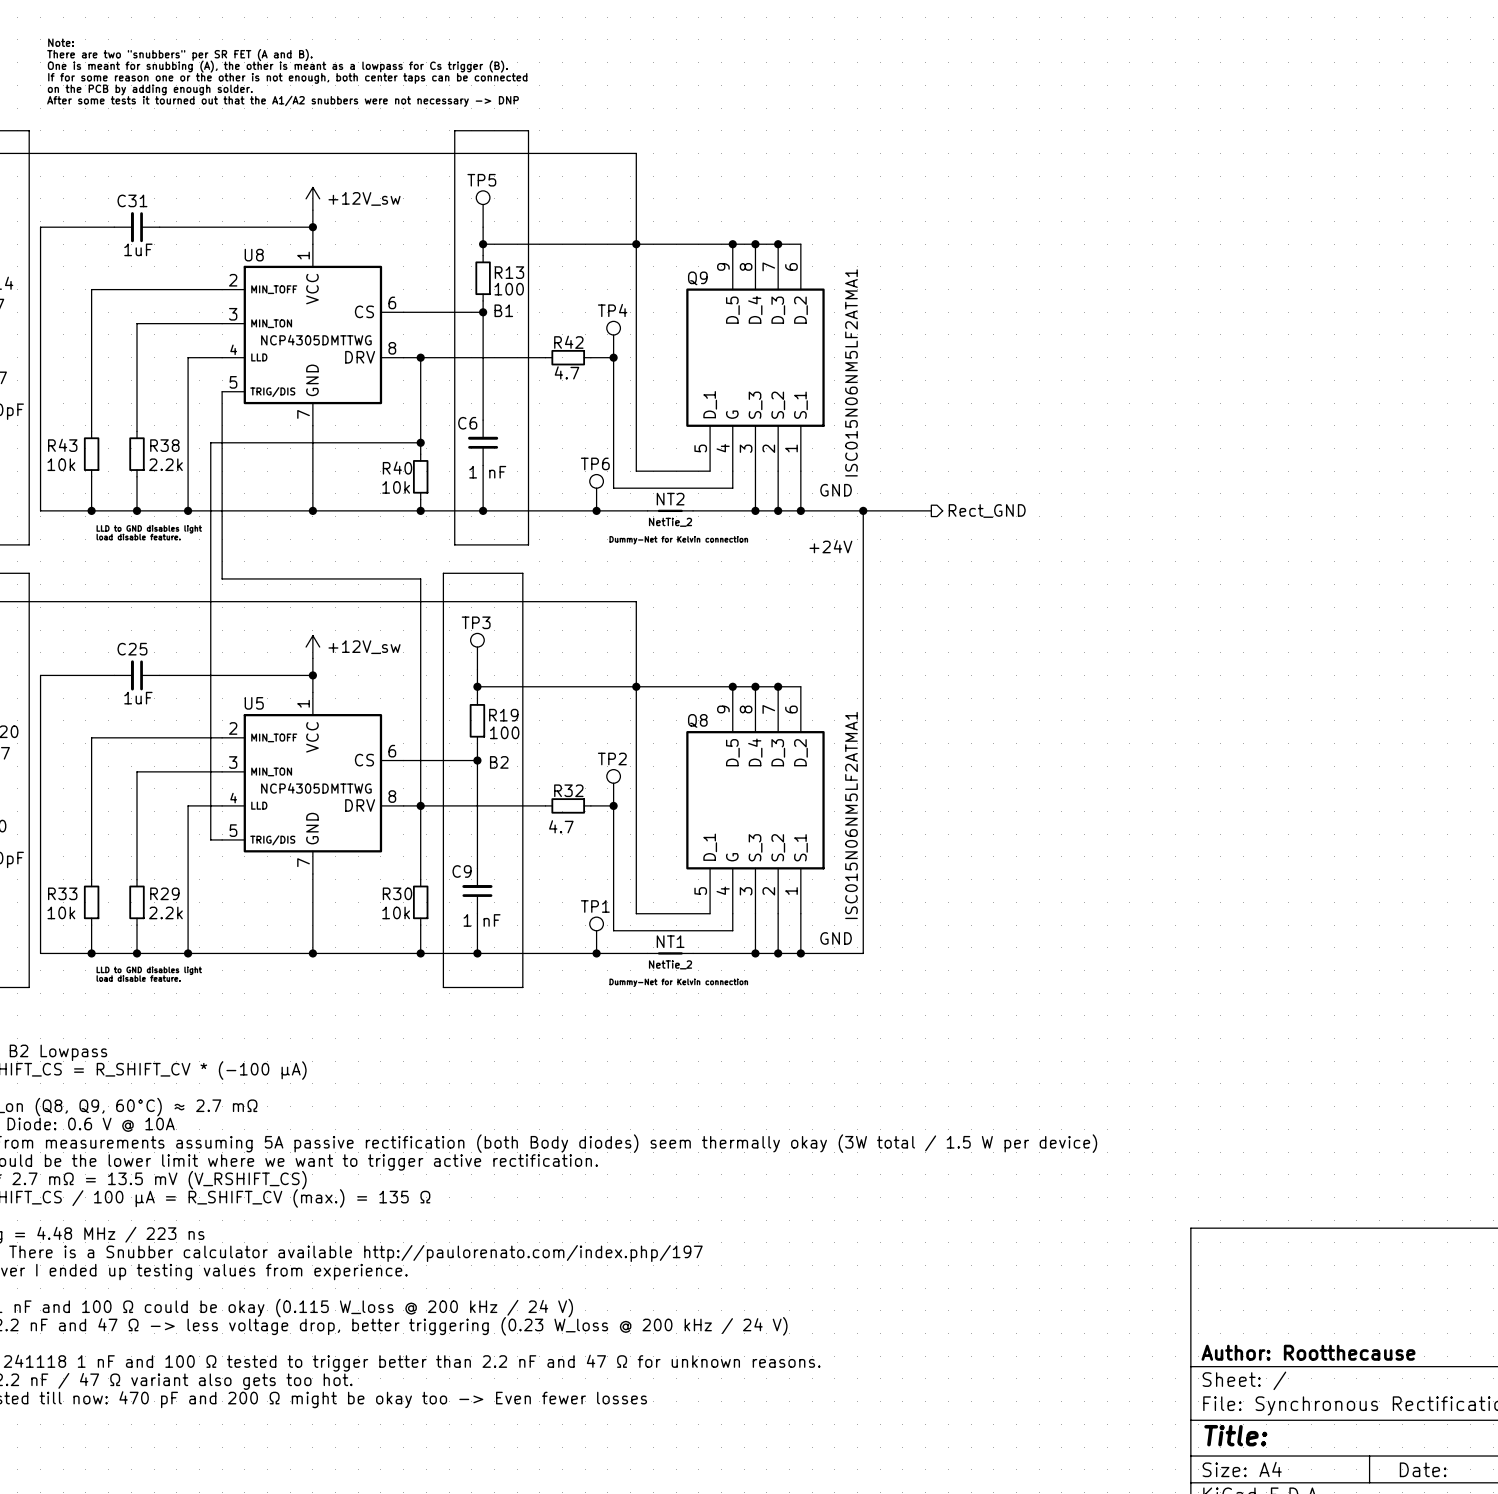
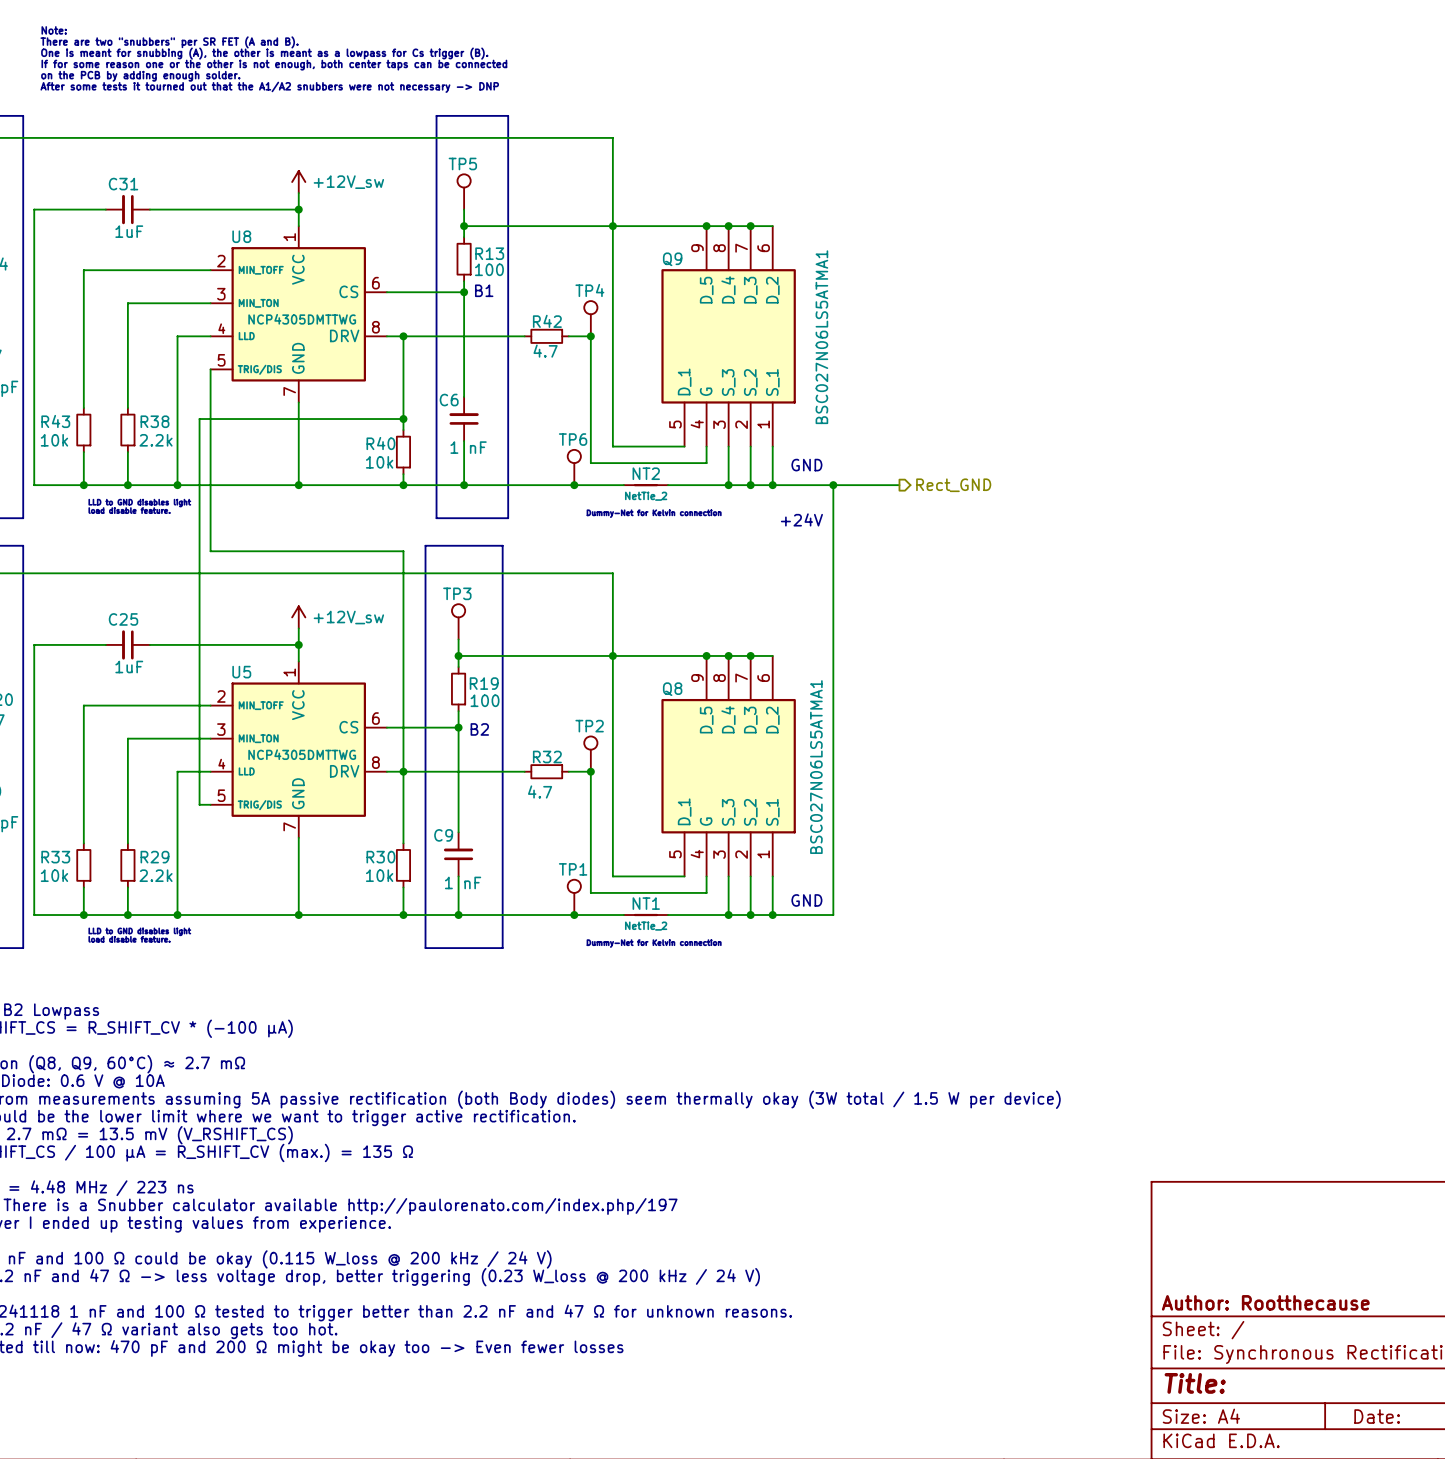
Q9 value: ISC015N06NM5LF2ATMA1 (851, 372) -> BSC027N06LS5ATMA1 (821, 337)
Q8 value: ISC015N06NM5LF2ATMA1 (851, 815) -> BSC027N06LS5ATMA1 (816, 767)

